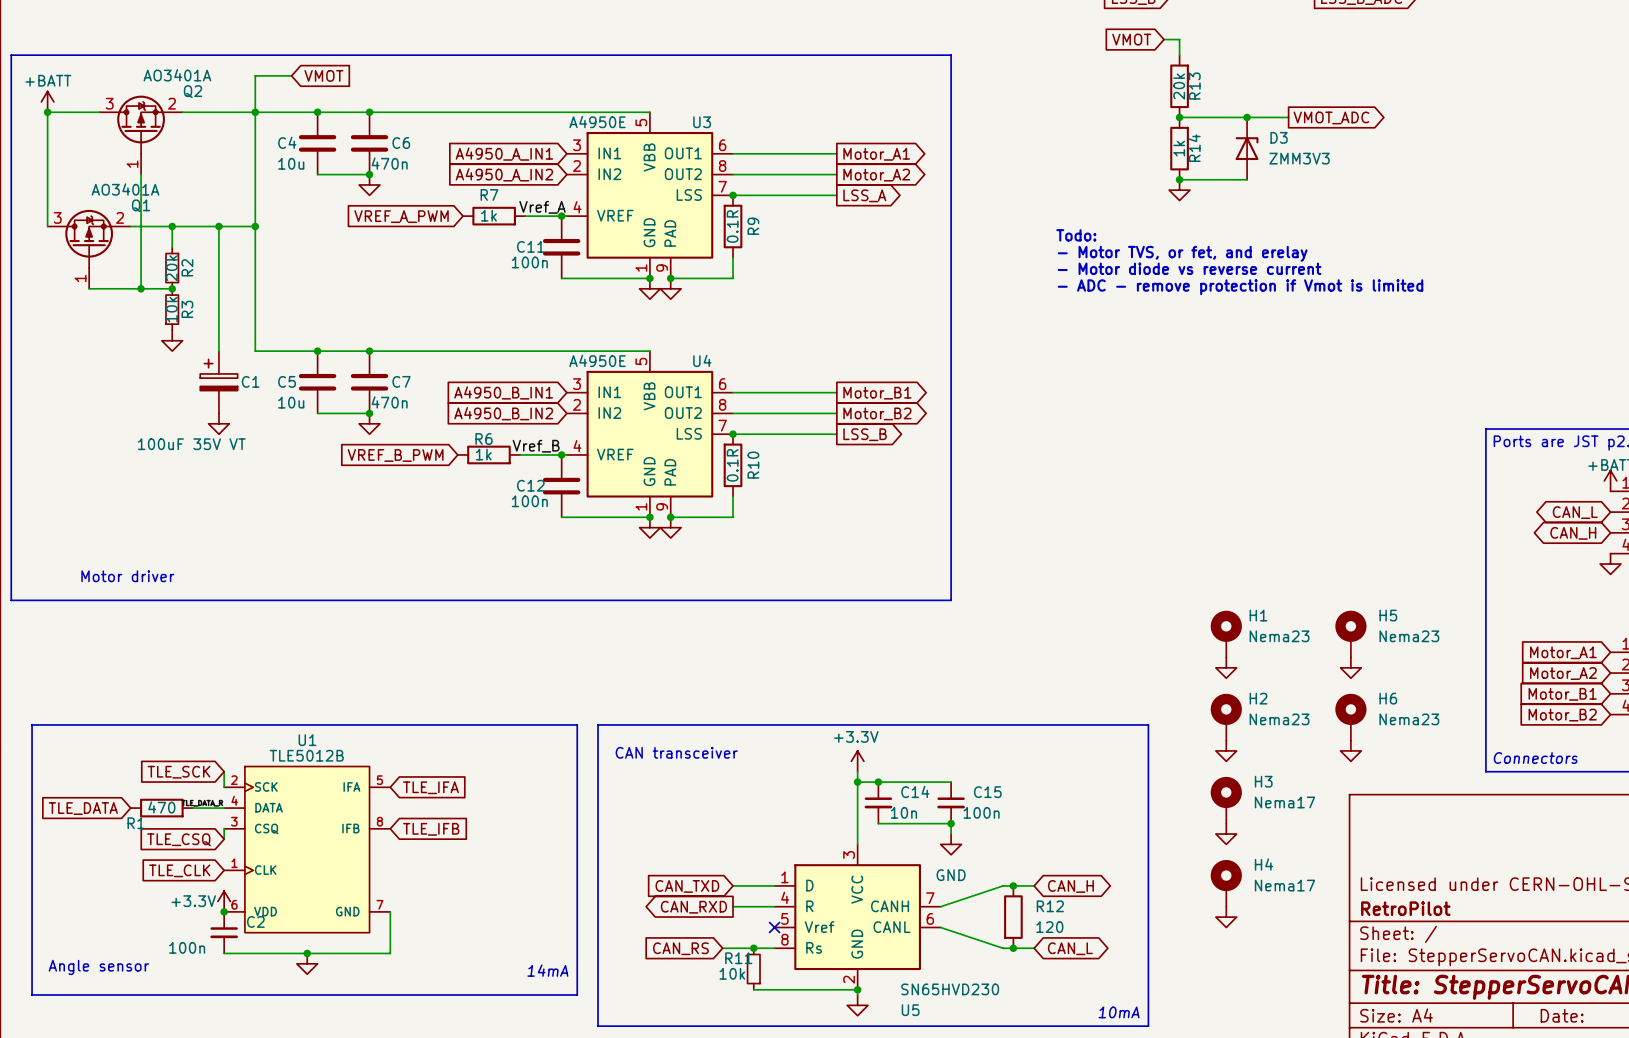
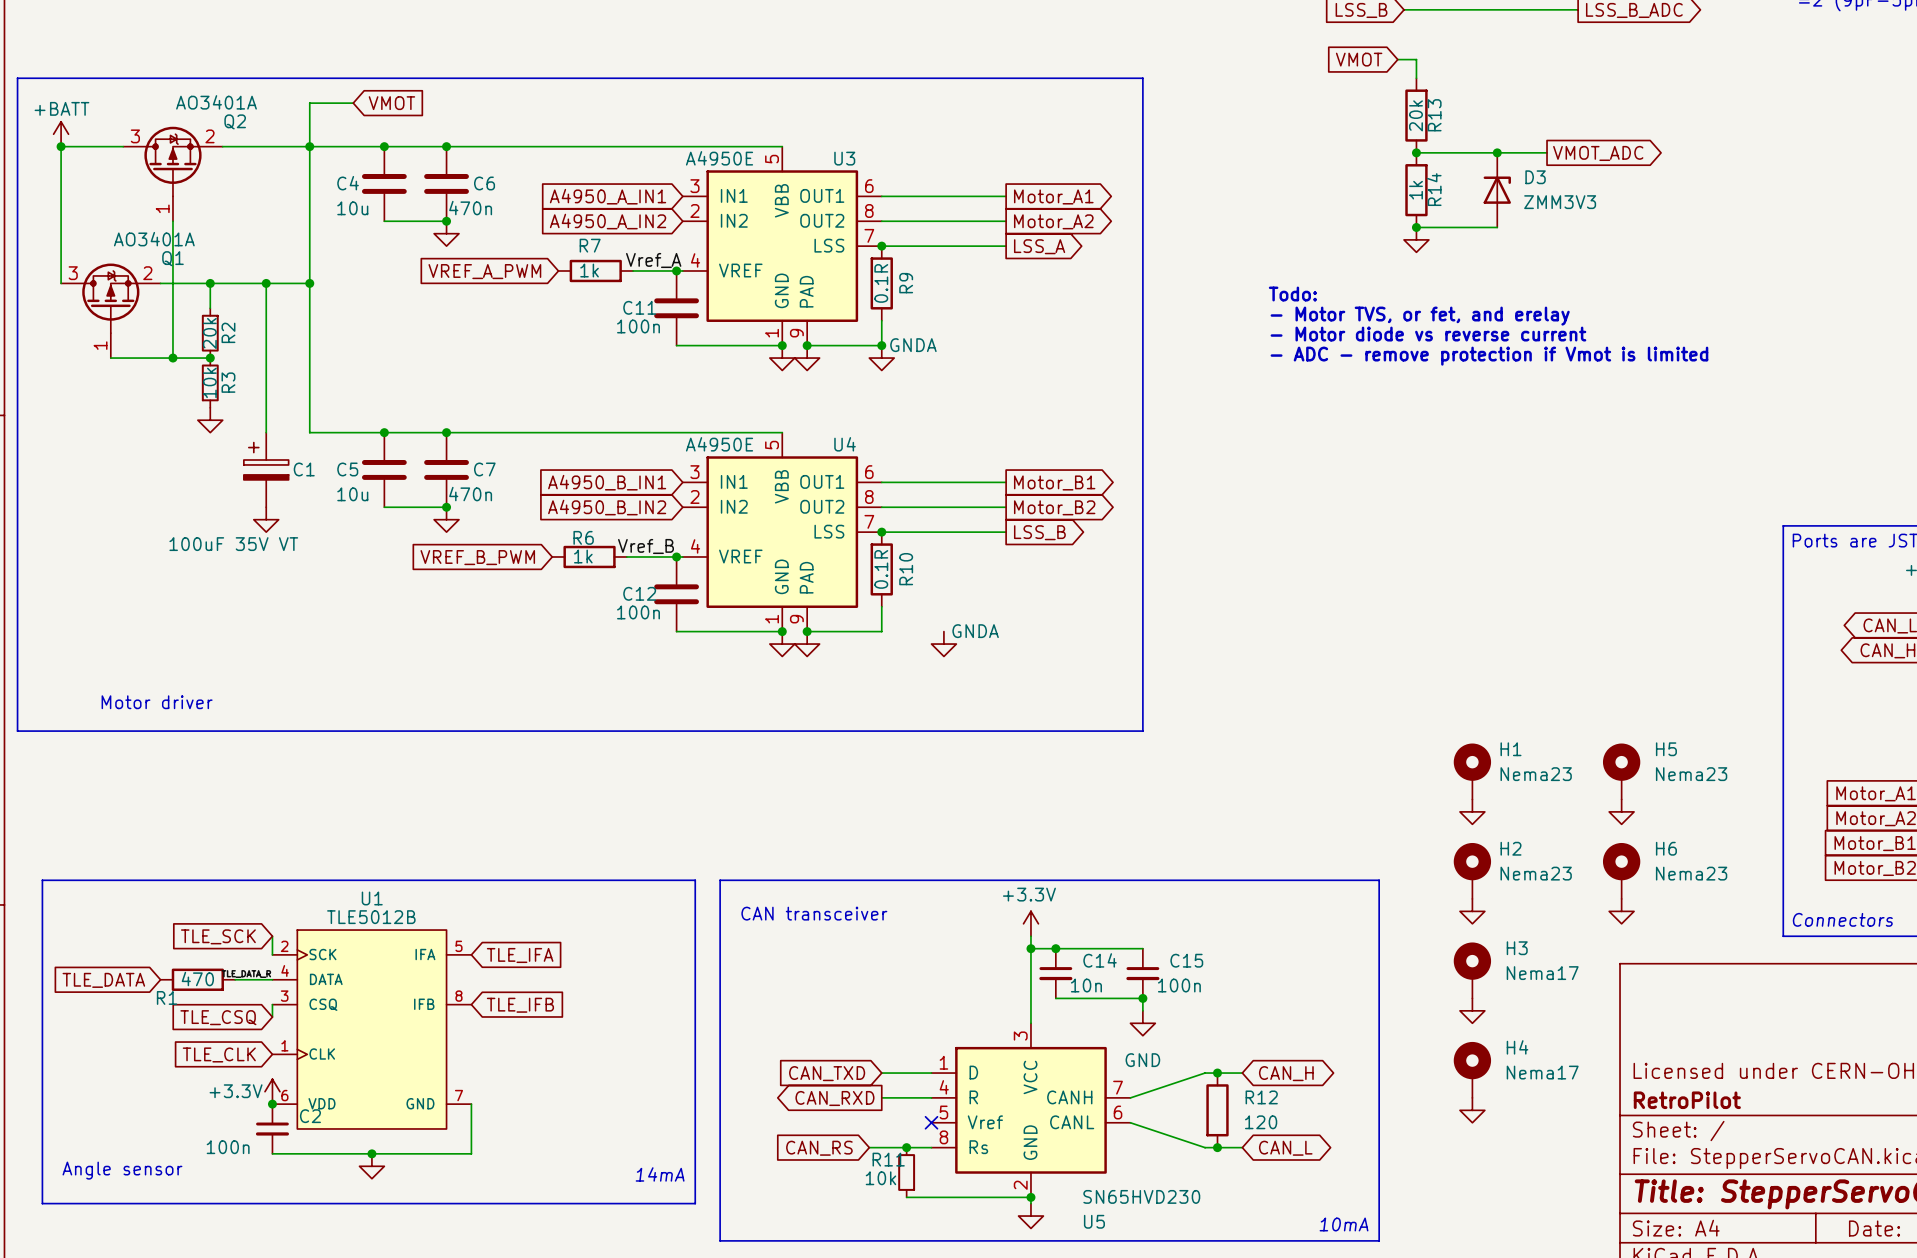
junction: none -> (881, 345)
power symbol: none -> GNDA (881, 358)
power symbol: none -> GNDA (943, 644)

